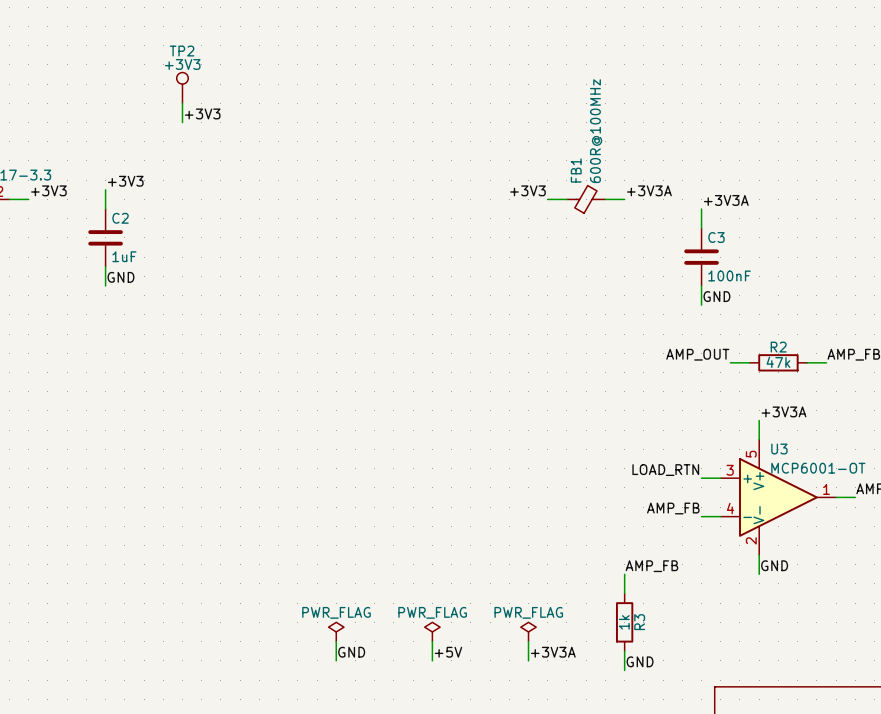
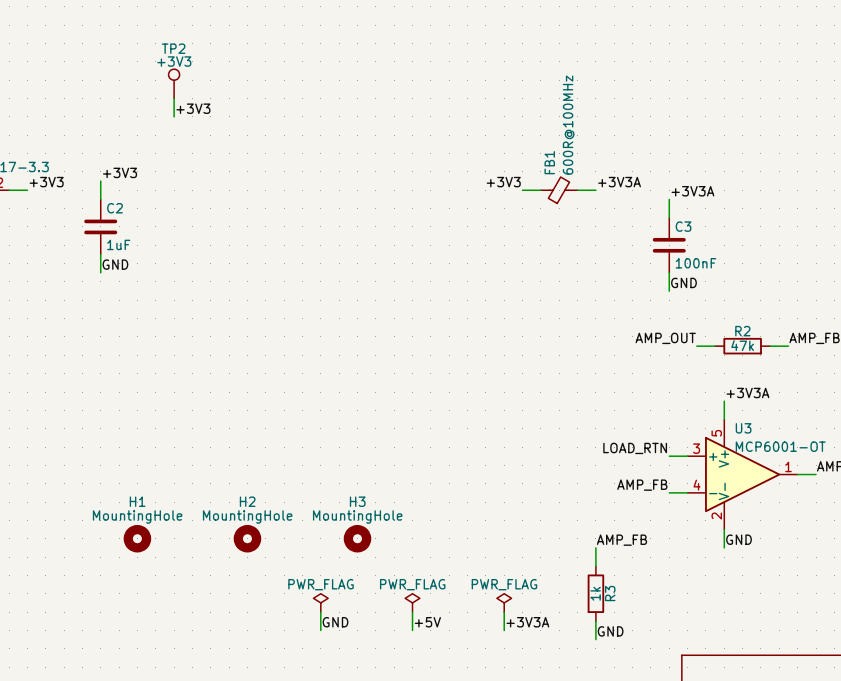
H1: none -> MountingHole (137, 538)
H2: none -> MountingHole (247, 538)
H3: none -> MountingHole (357, 538)

